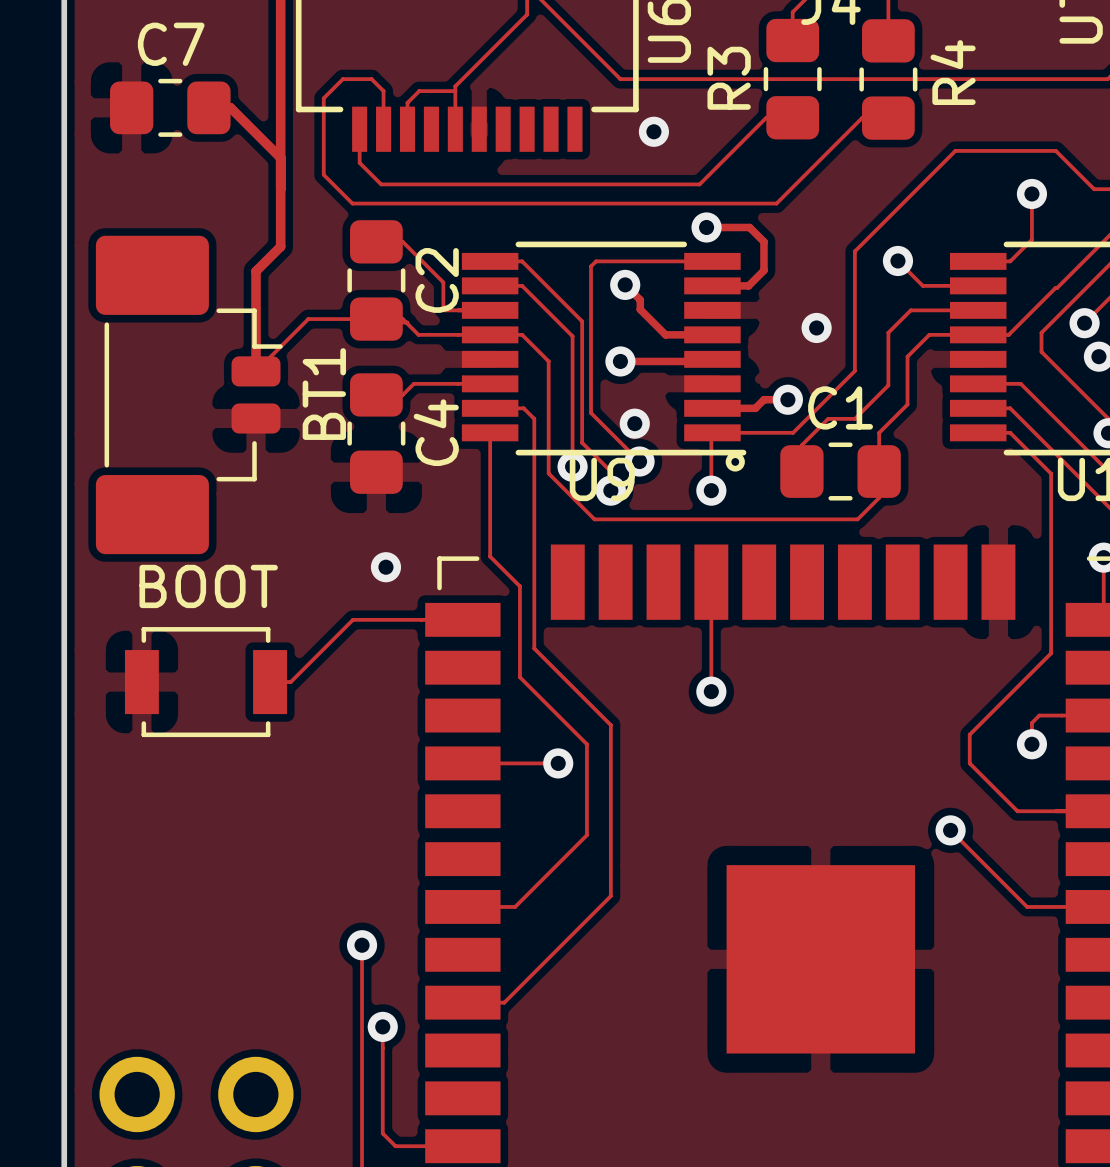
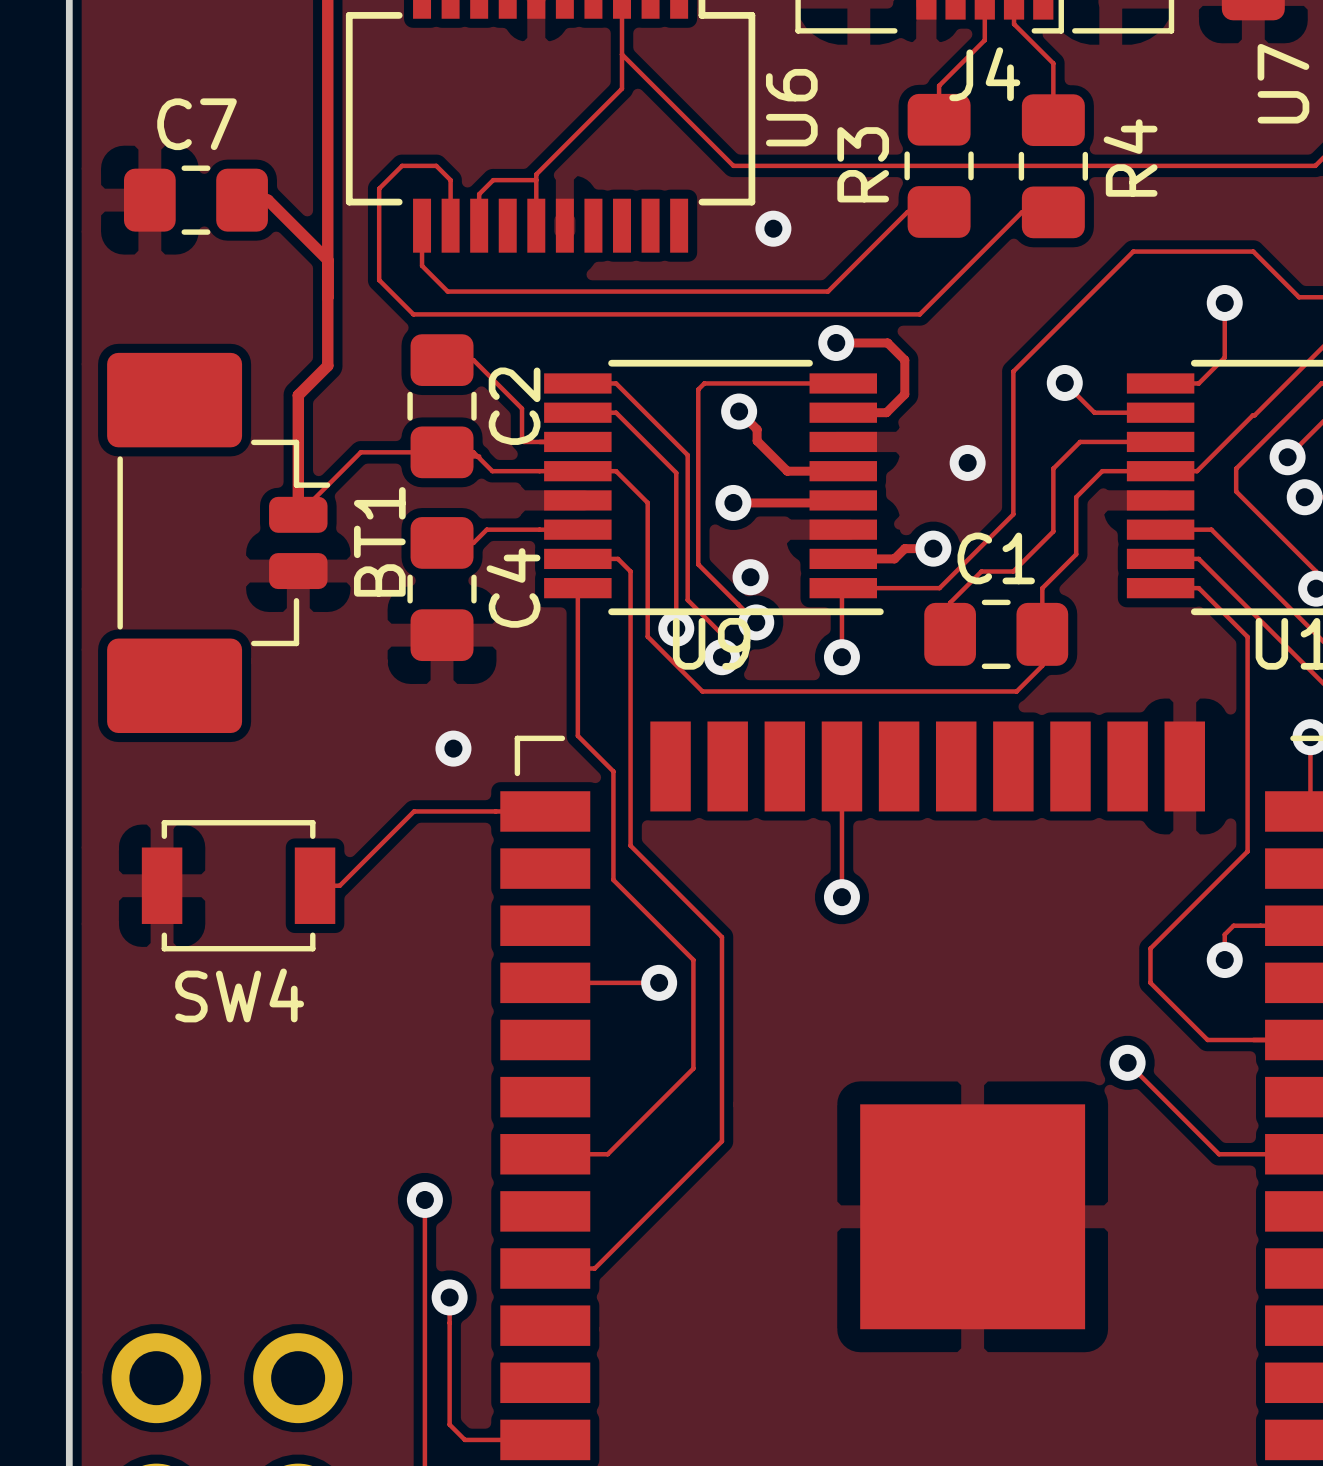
drawing: [725, 452, 745, 472] -> none
SW4 value: BOOT (208, 586) -> none
SW4 name: none -> SW4 (239, 995)

